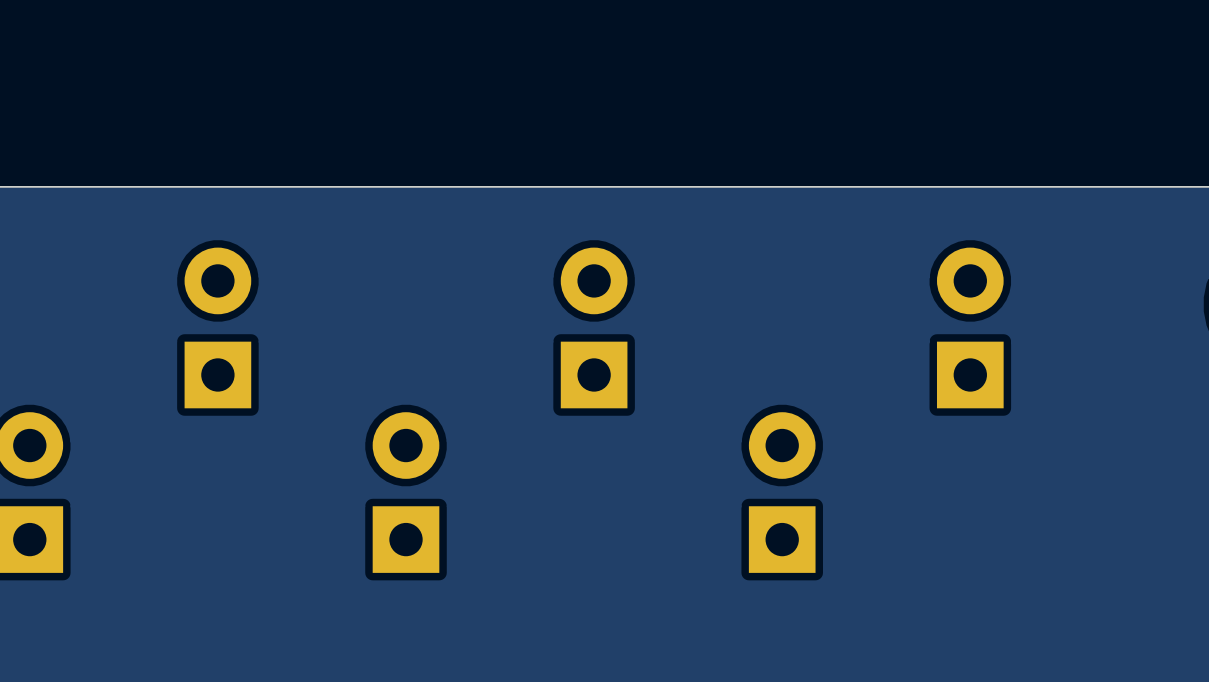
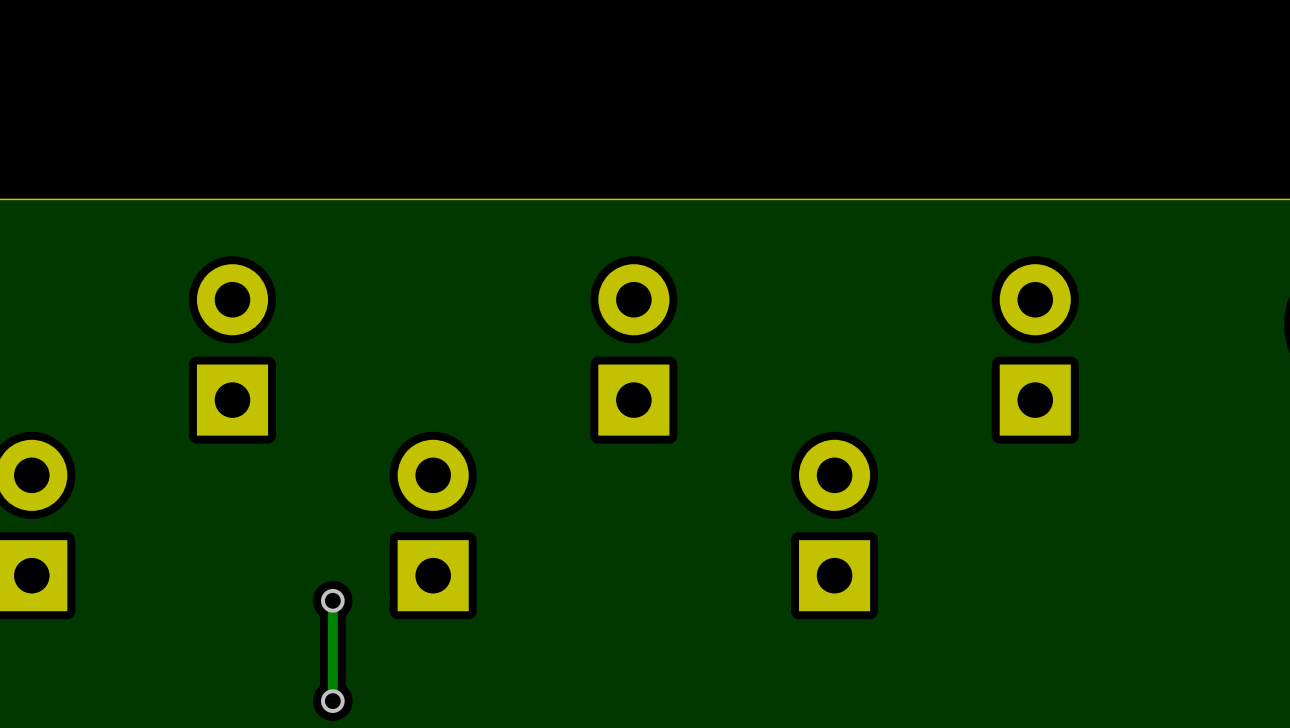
track: none -> (332, 600) (332, 701)
via: none -> (332, 600)
via: none -> (332, 701)

